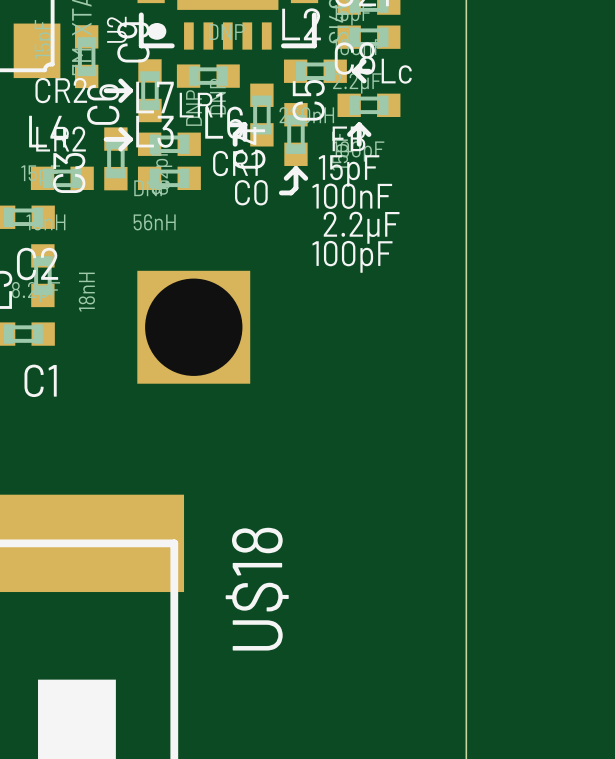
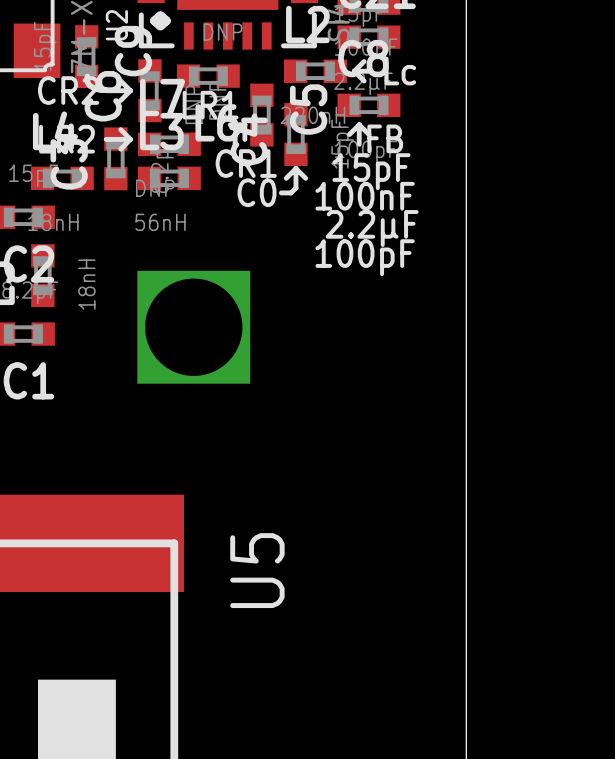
U$18 name: U$18 (257, 589) -> U5 (257, 570)

